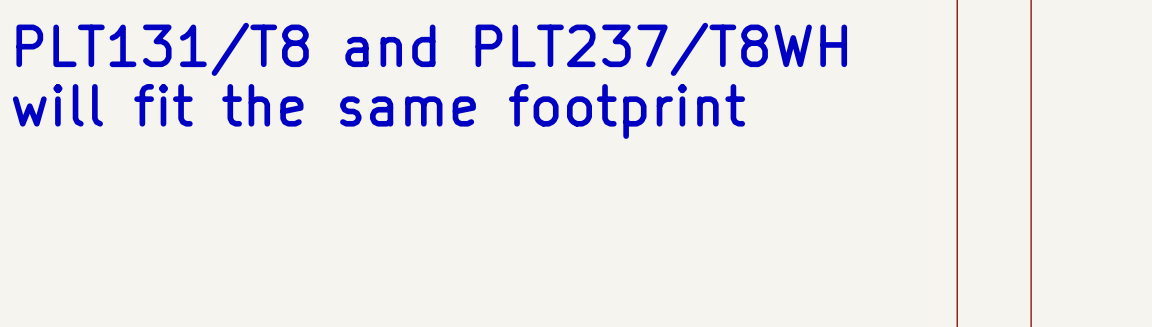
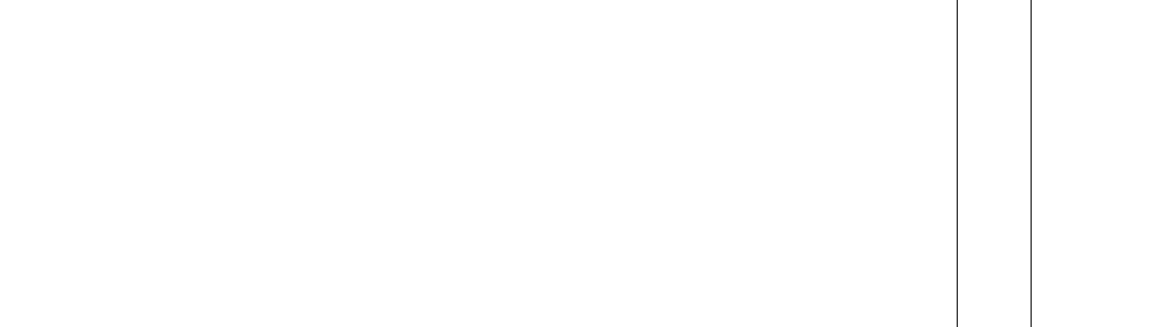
text: PLT131/T8 and PLT237/T8WH (431, 49) -> none
text: will fit the same footprint (378, 111) -> none

